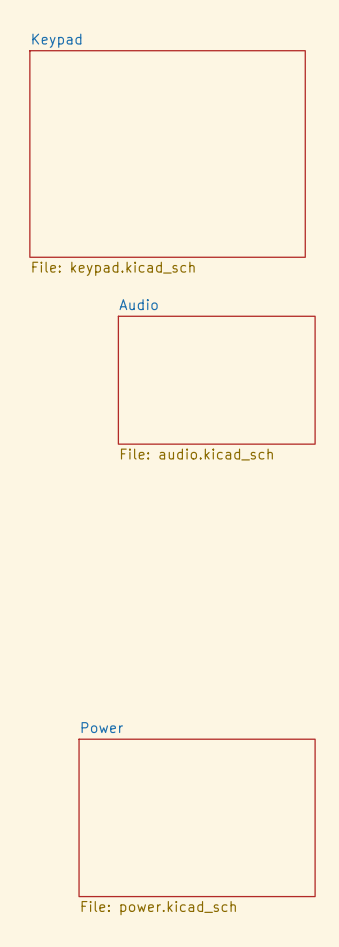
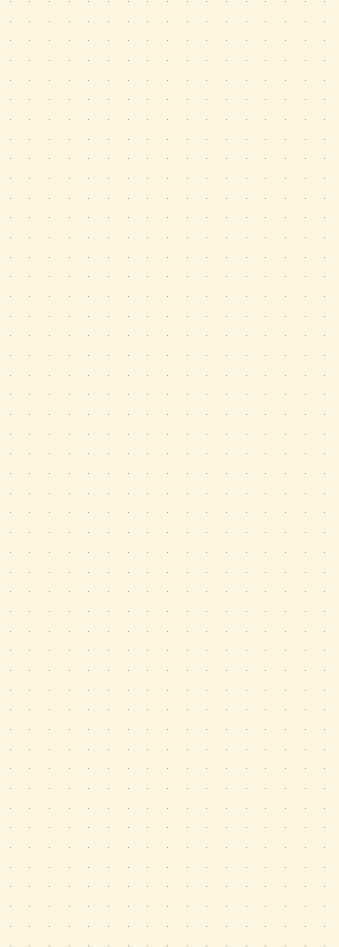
sheet Keypad: File: keypad.kicad_sch (167, 153) -> none
sheet Audio: File: audio.kicad_sch (216, 380) -> none
sheet Power: File: power.kicad_sch (197, 817) -> none

